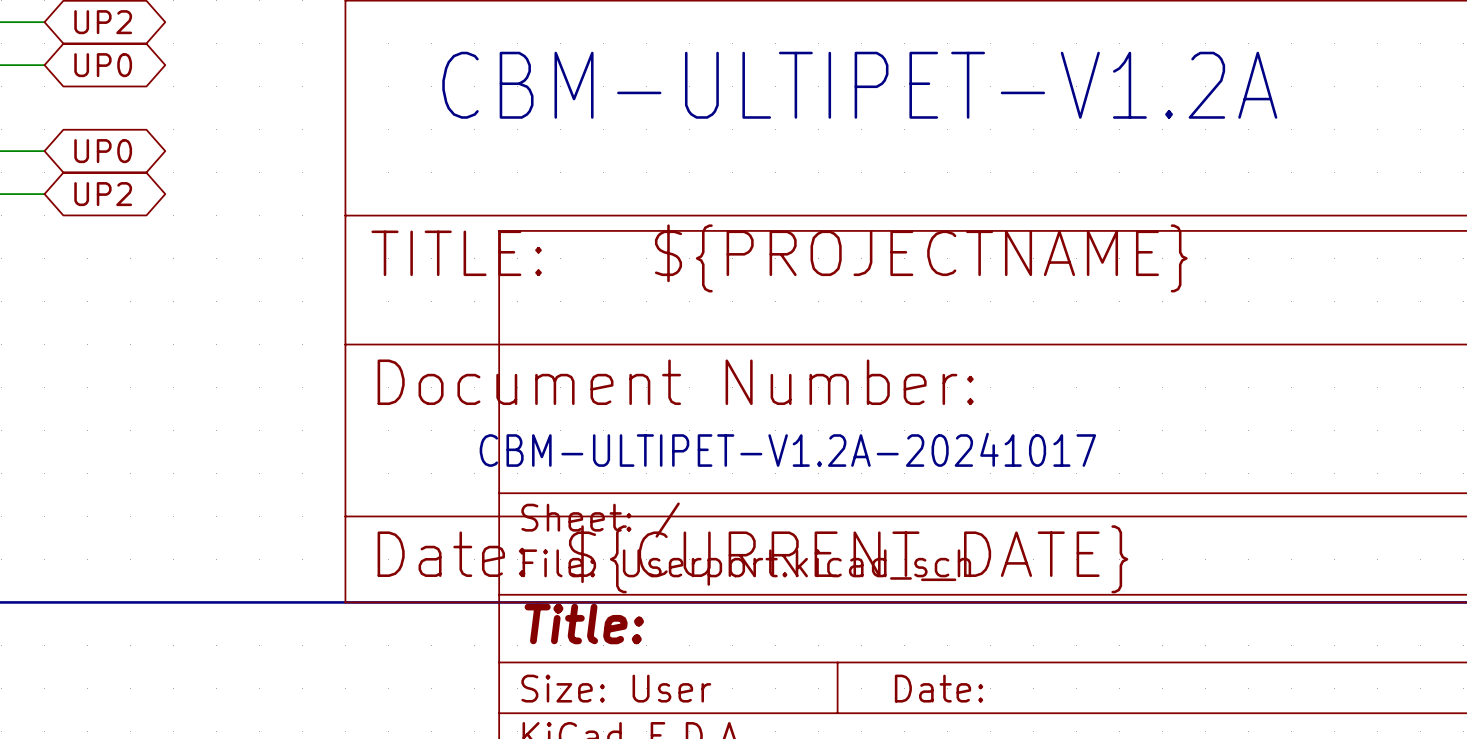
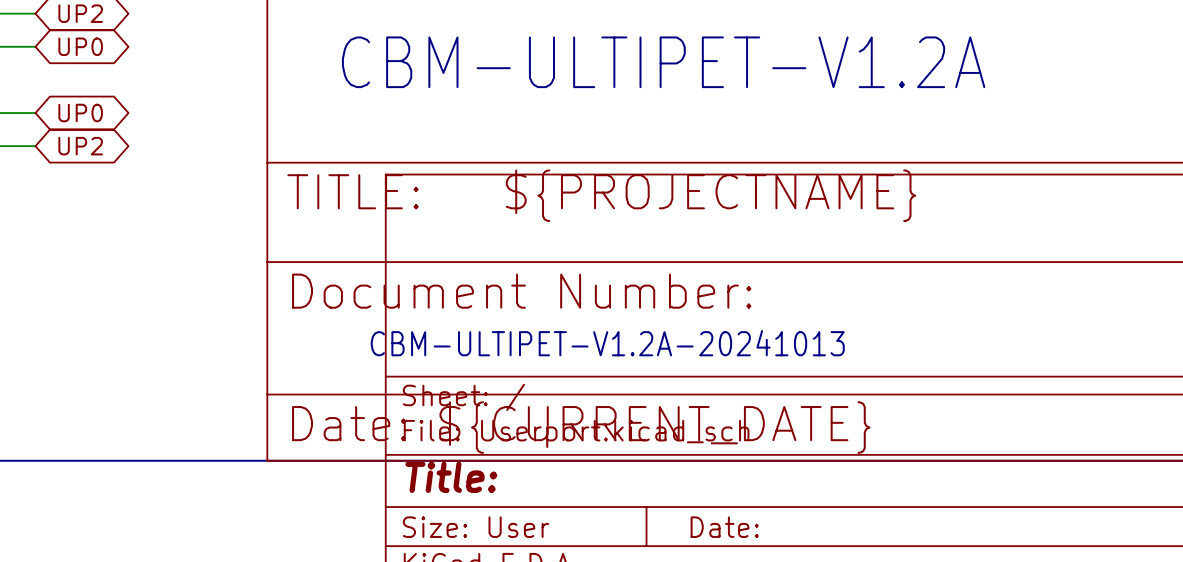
text: CBM-ULTIPET-V1.2A-20241017 (787, 449) -> CBM-ULTIPET-V1.2A-20241013 (607, 343)

